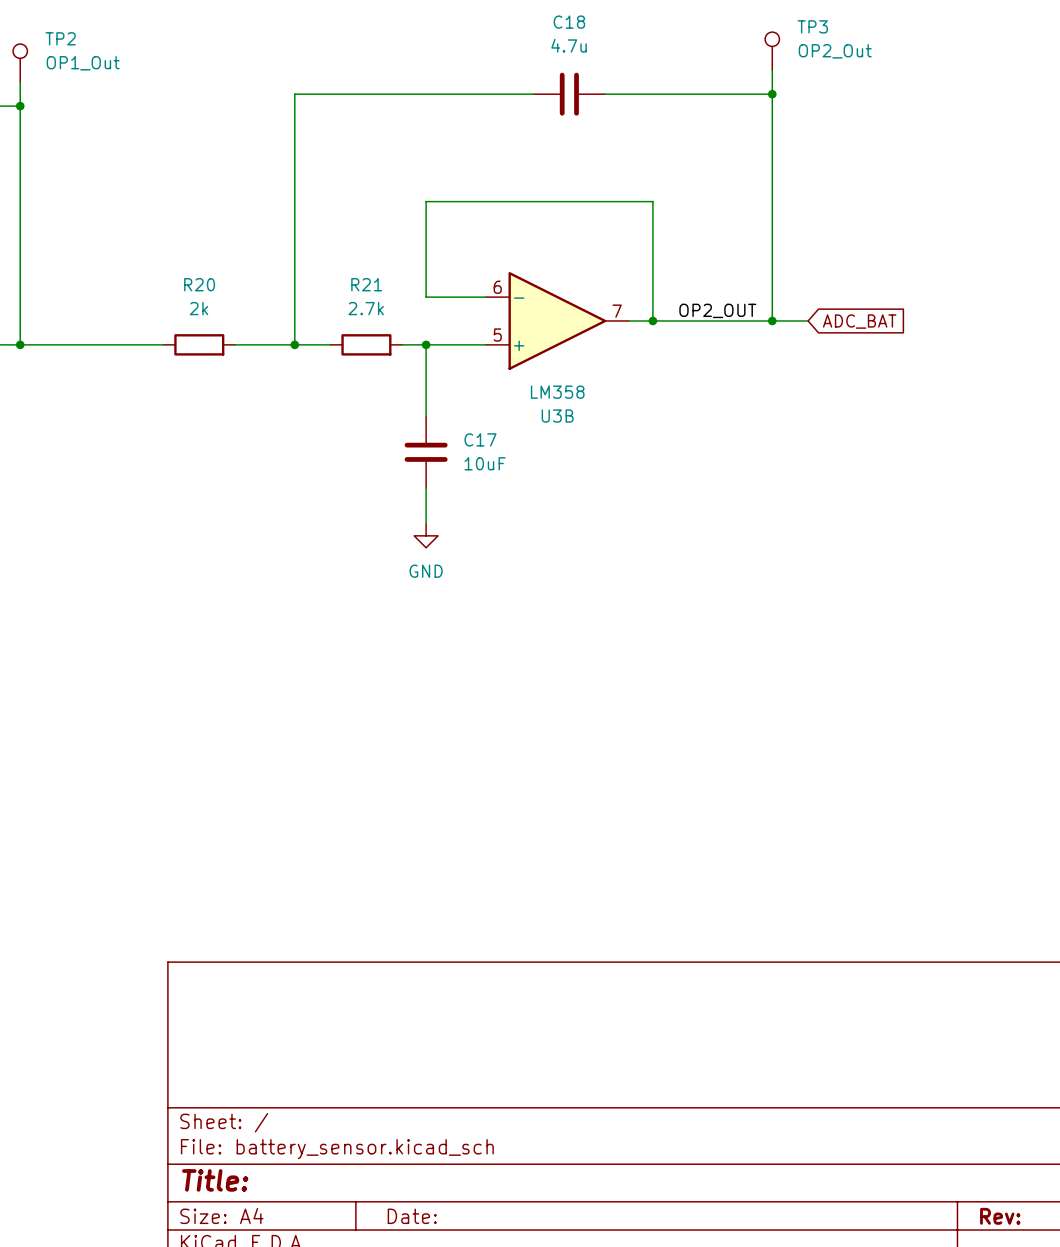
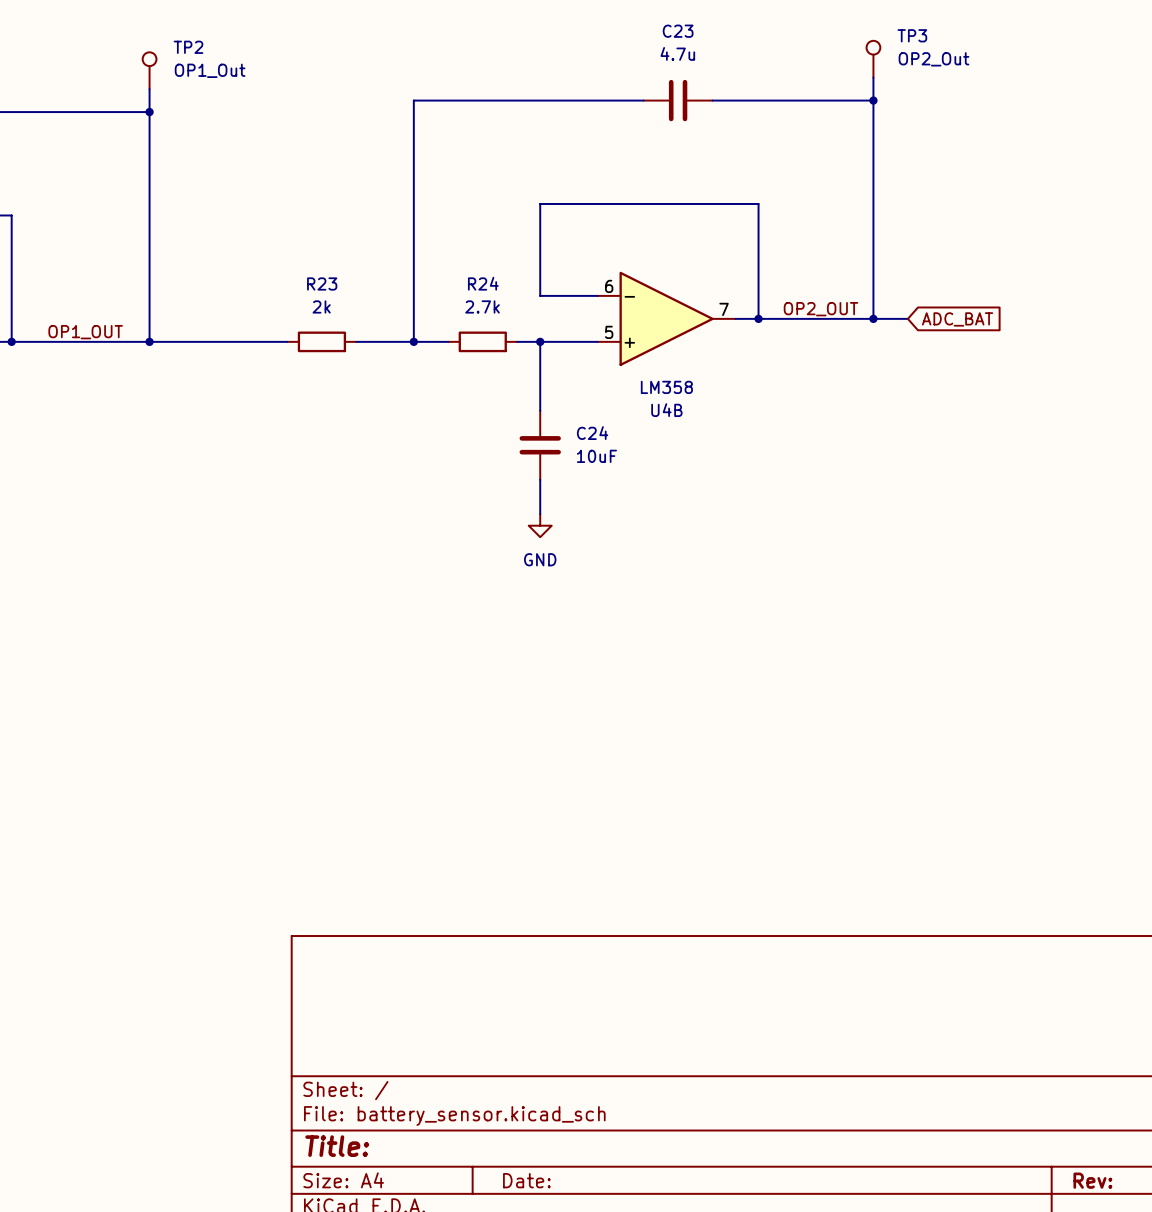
C18 name: C18 (569, 22) -> C23 (678, 31)
R20 name: R20 (199, 284) -> R23 (322, 283)
R21 name: R21 (366, 284) -> R24 (483, 283)
U3B name: U3B (557, 416) -> U4B (666, 410)
C17 name: C17 (480, 439) -> C24 (592, 433)

